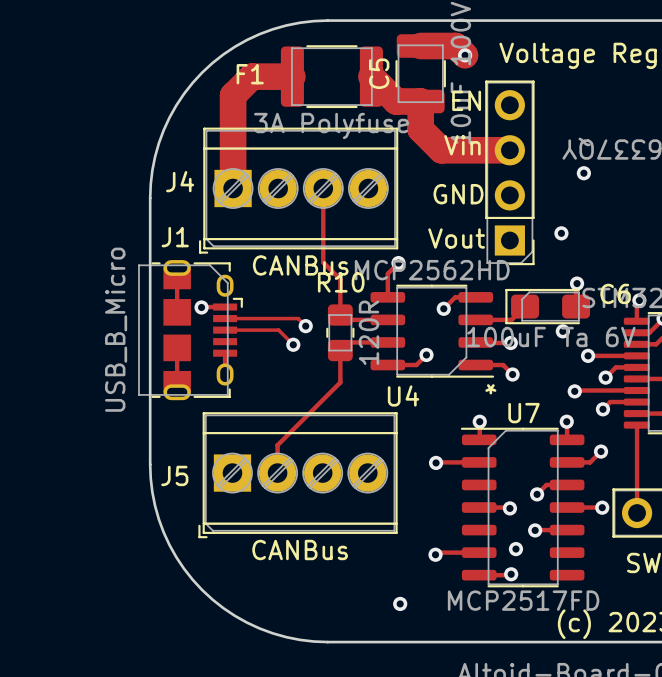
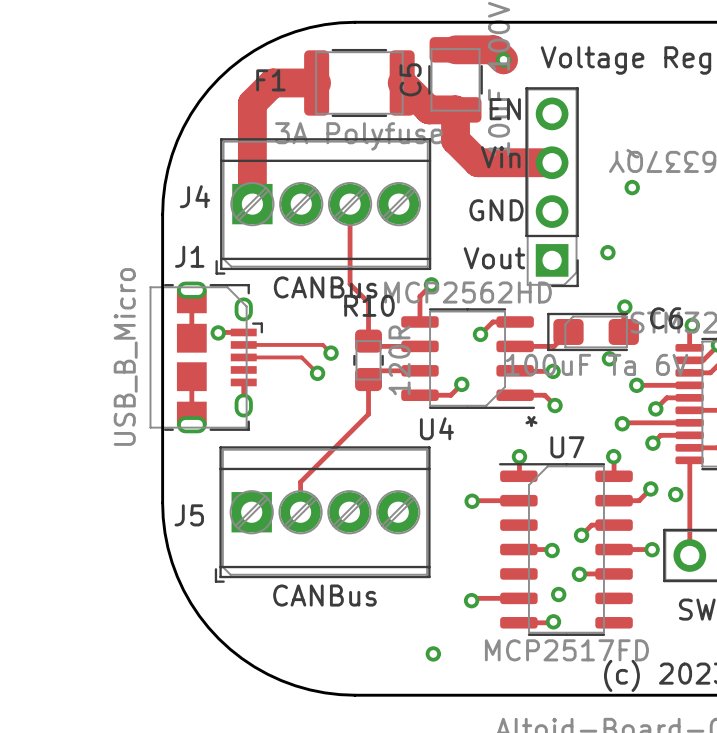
via: none -> (675, 494)

